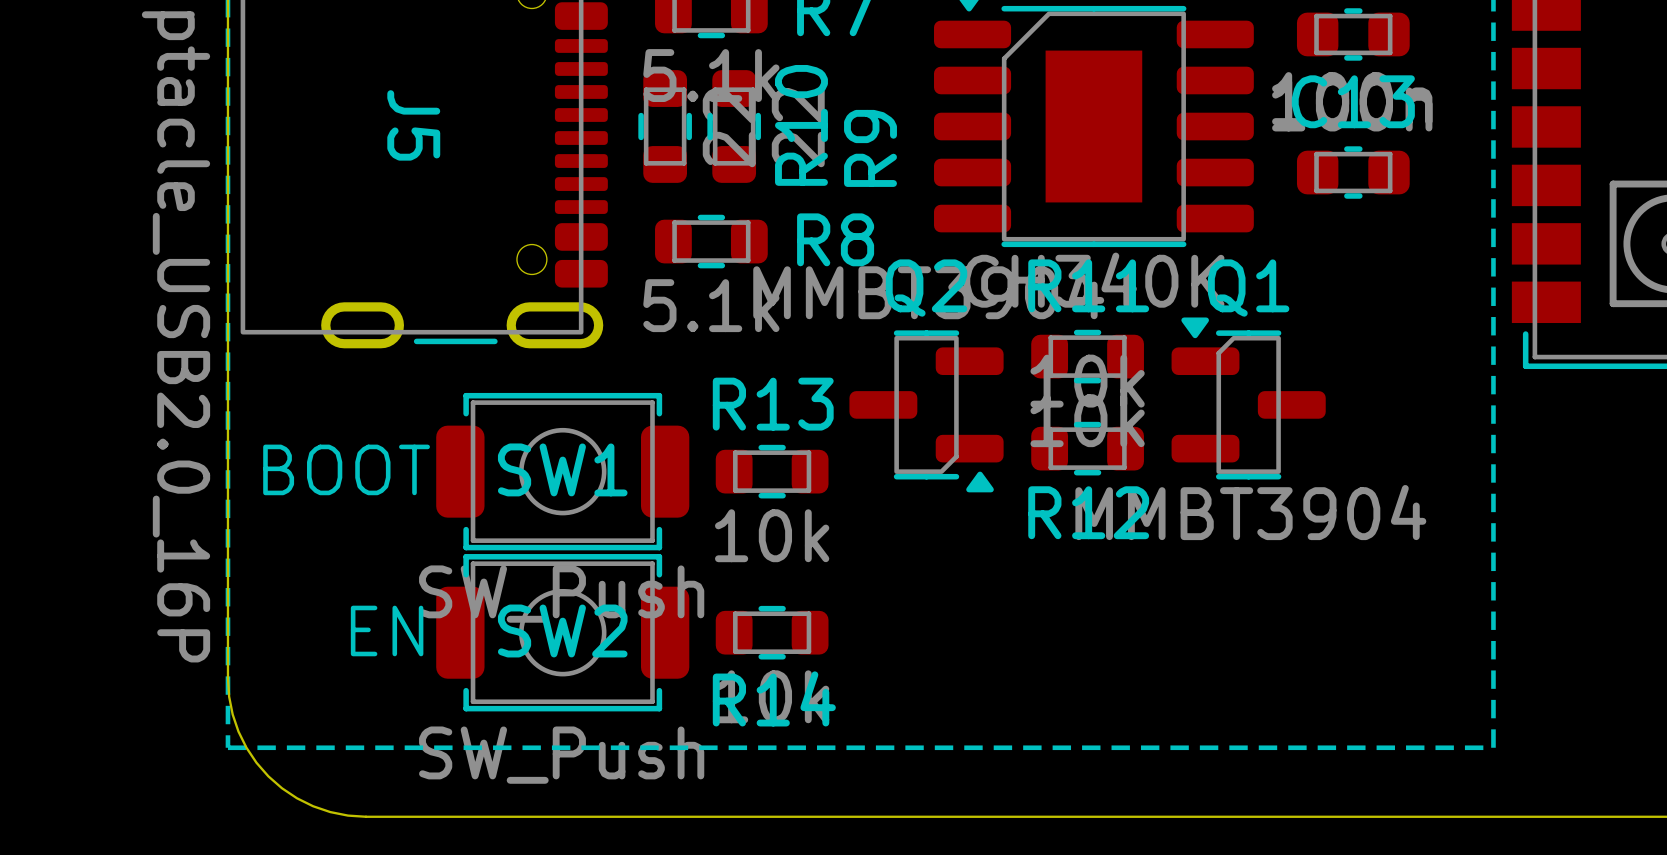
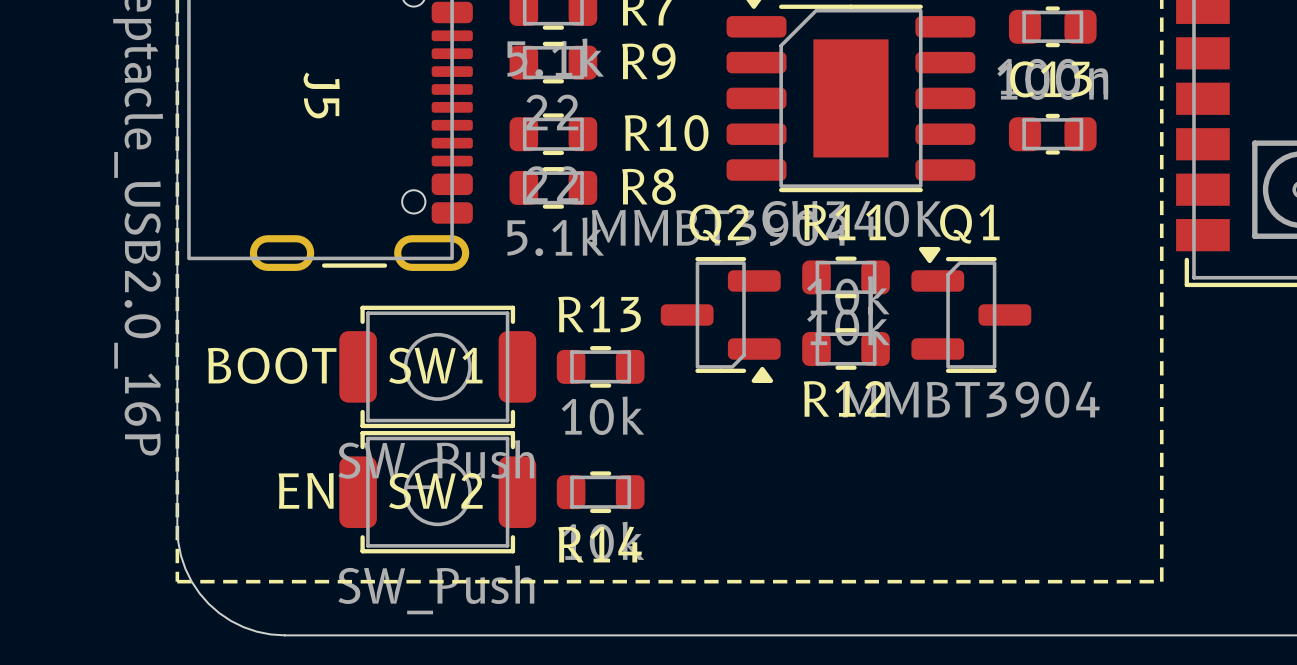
R10 rotation: 0° (665, 126) -> 90° clockwise (553, 134)
R9 rotation: 0° (734, 126) -> 90° clockwise (553, 62)

